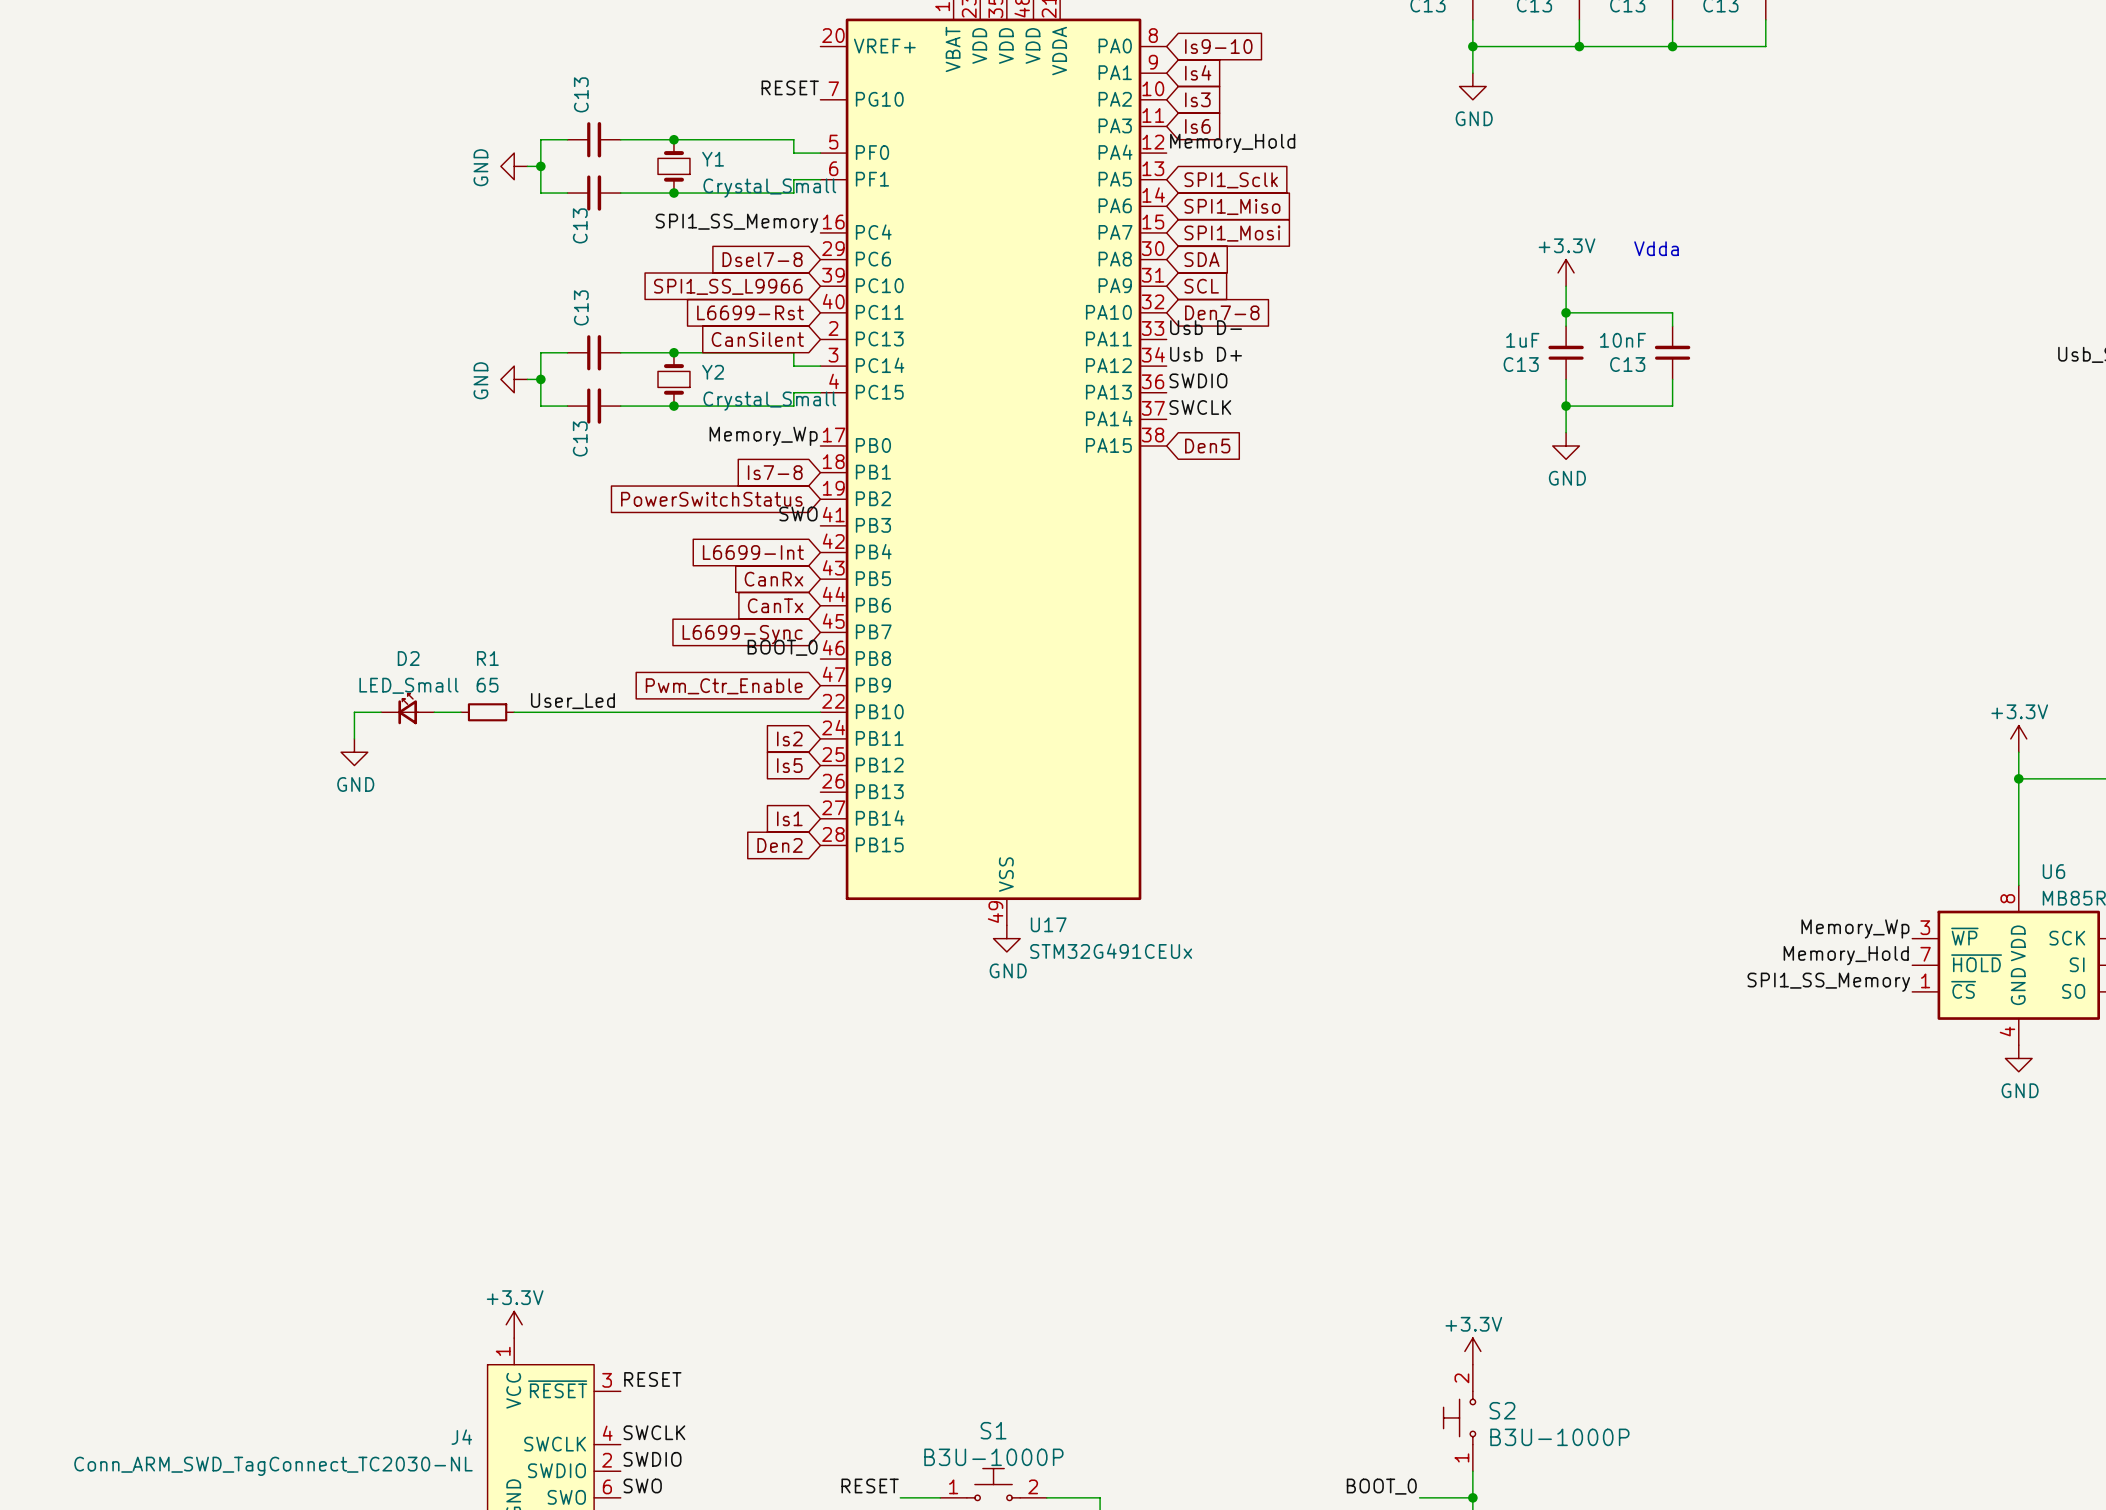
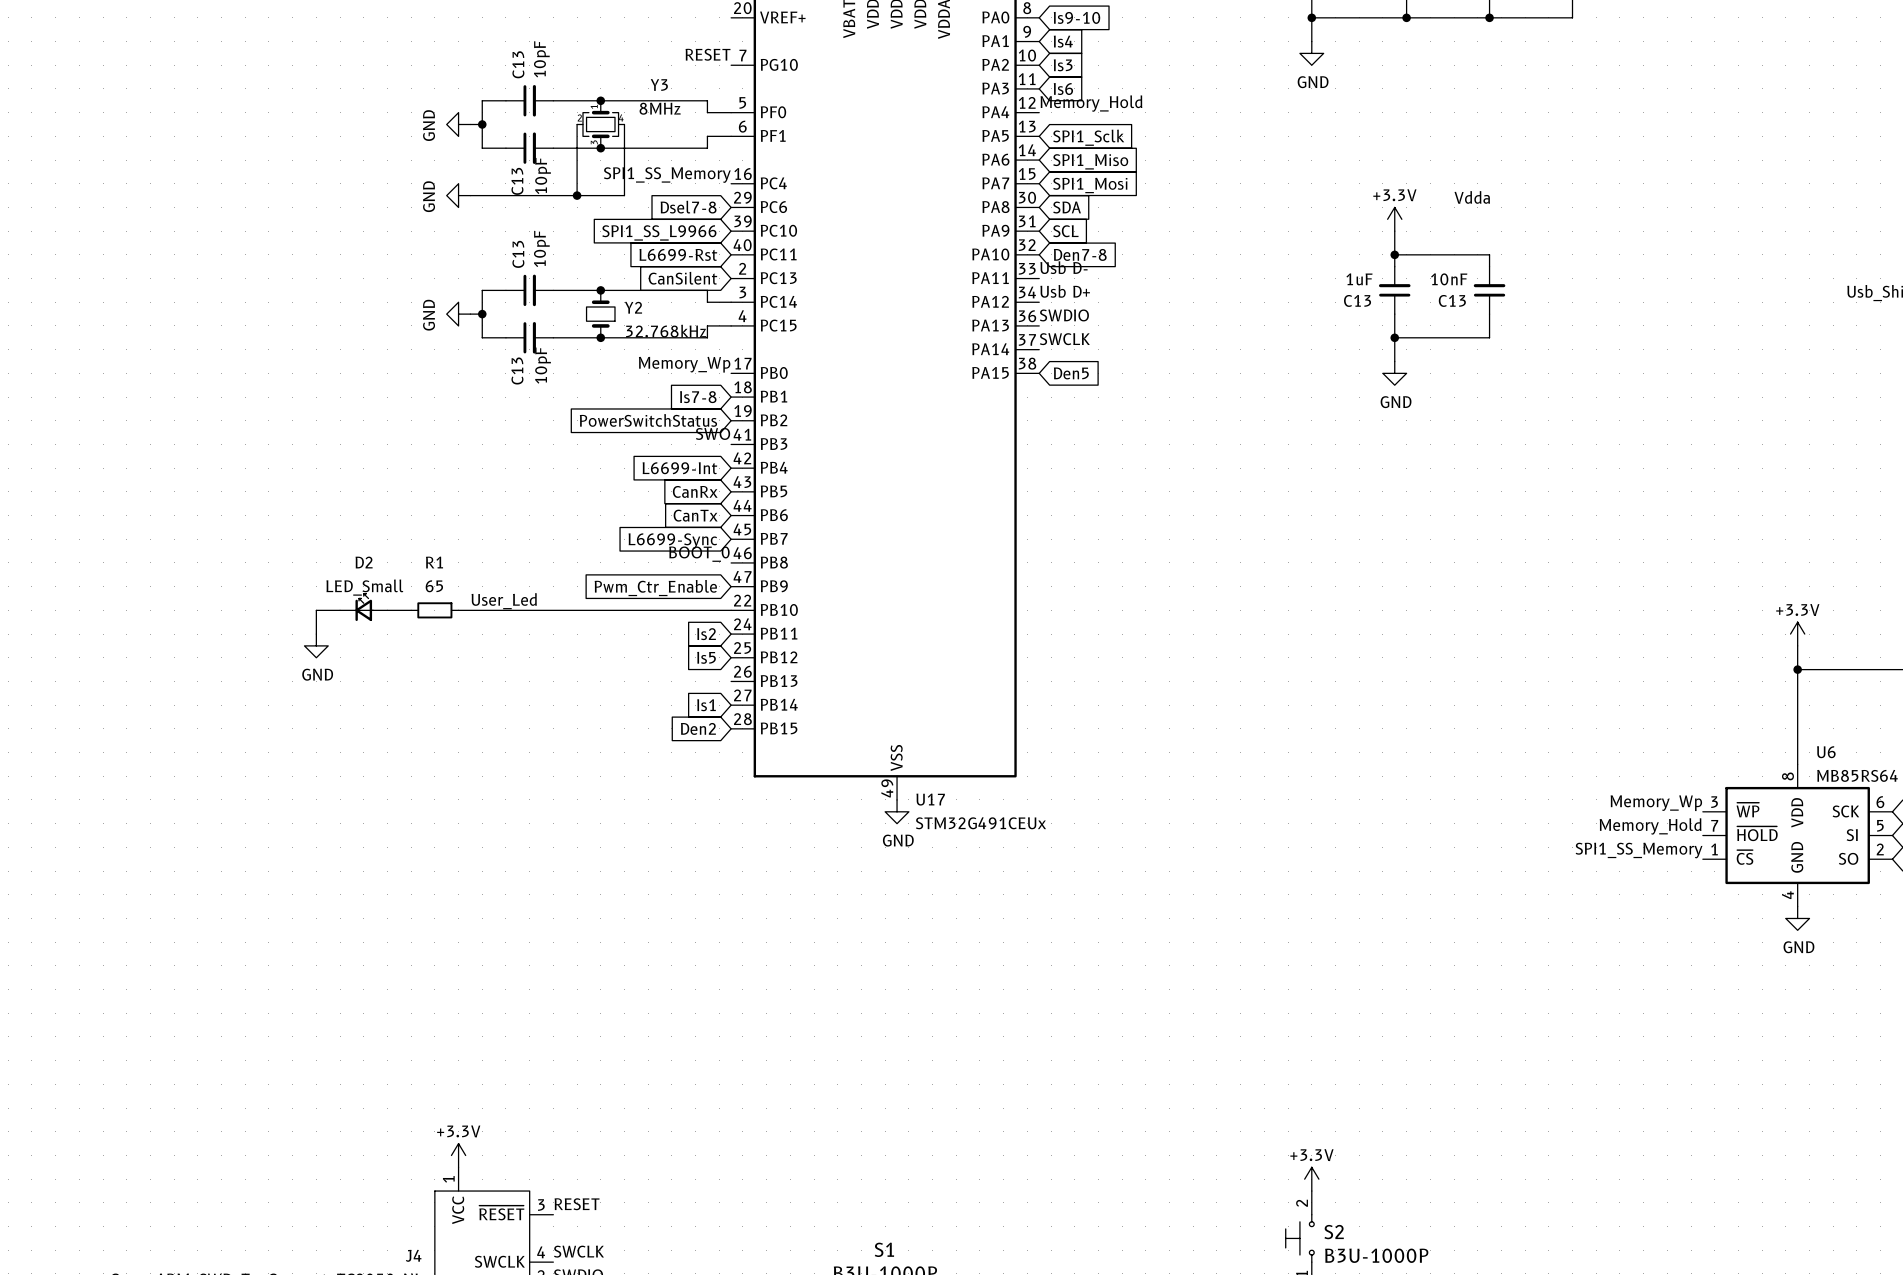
C13 value: none -> 10pF (541, 59)
wire: none -> (577, 124) (577, 195)
Y1: Crystal_Small (673, 166) -> none
Y3: none -> 8MHz (600, 124)
wire: none -> (624, 124) (624, 195) (470, 195)
C13 value: none -> 10pF (543, 175)
power symbol: none -> GND (458, 195)
junction: none -> (577, 195)
C13 value: none -> 10pF (541, 248)
Y2 value: Crystal_Small (769, 401) -> 32.768kHz (666, 331)
C13 value: none -> 10pF (543, 365)

